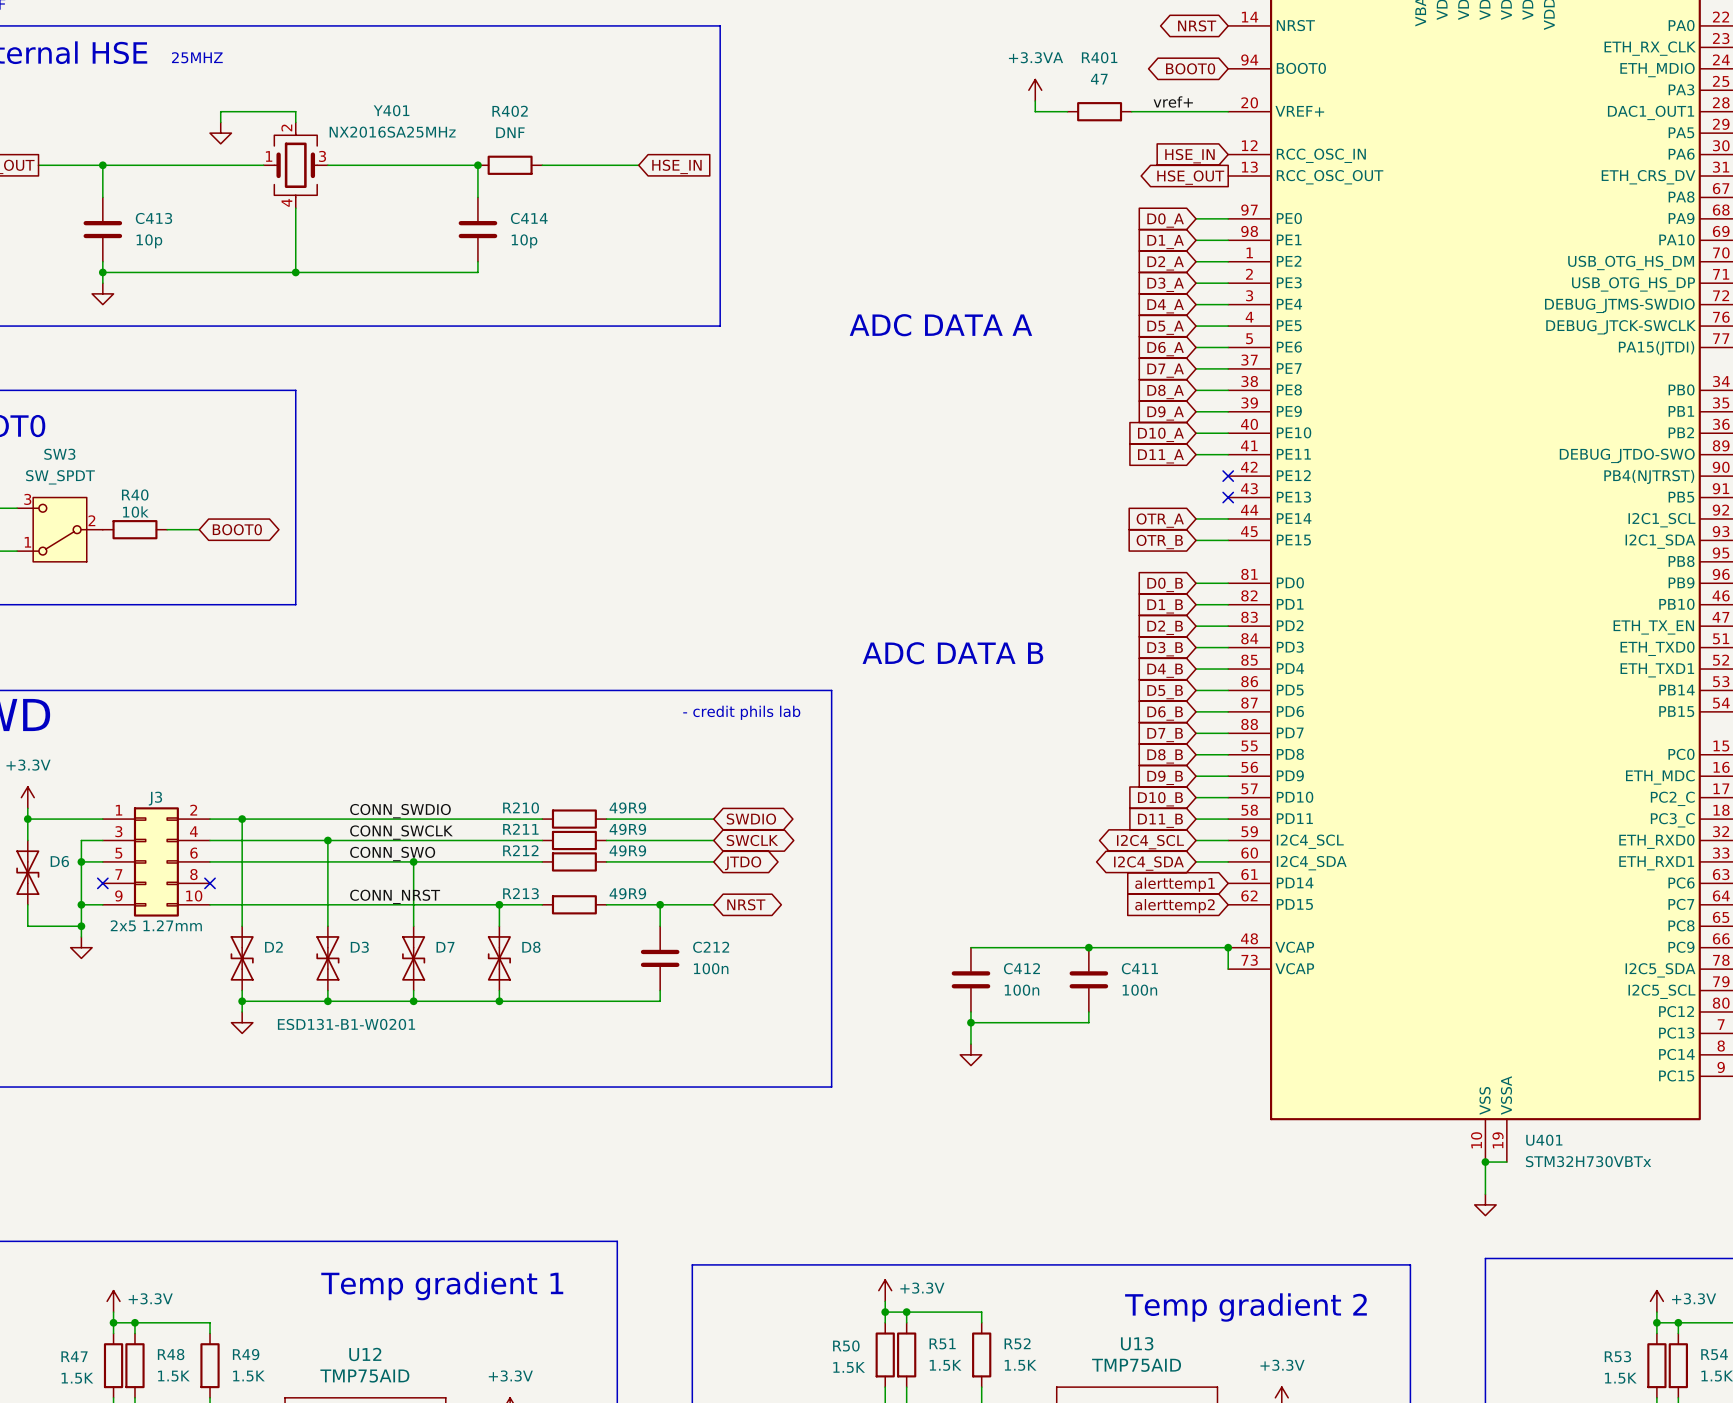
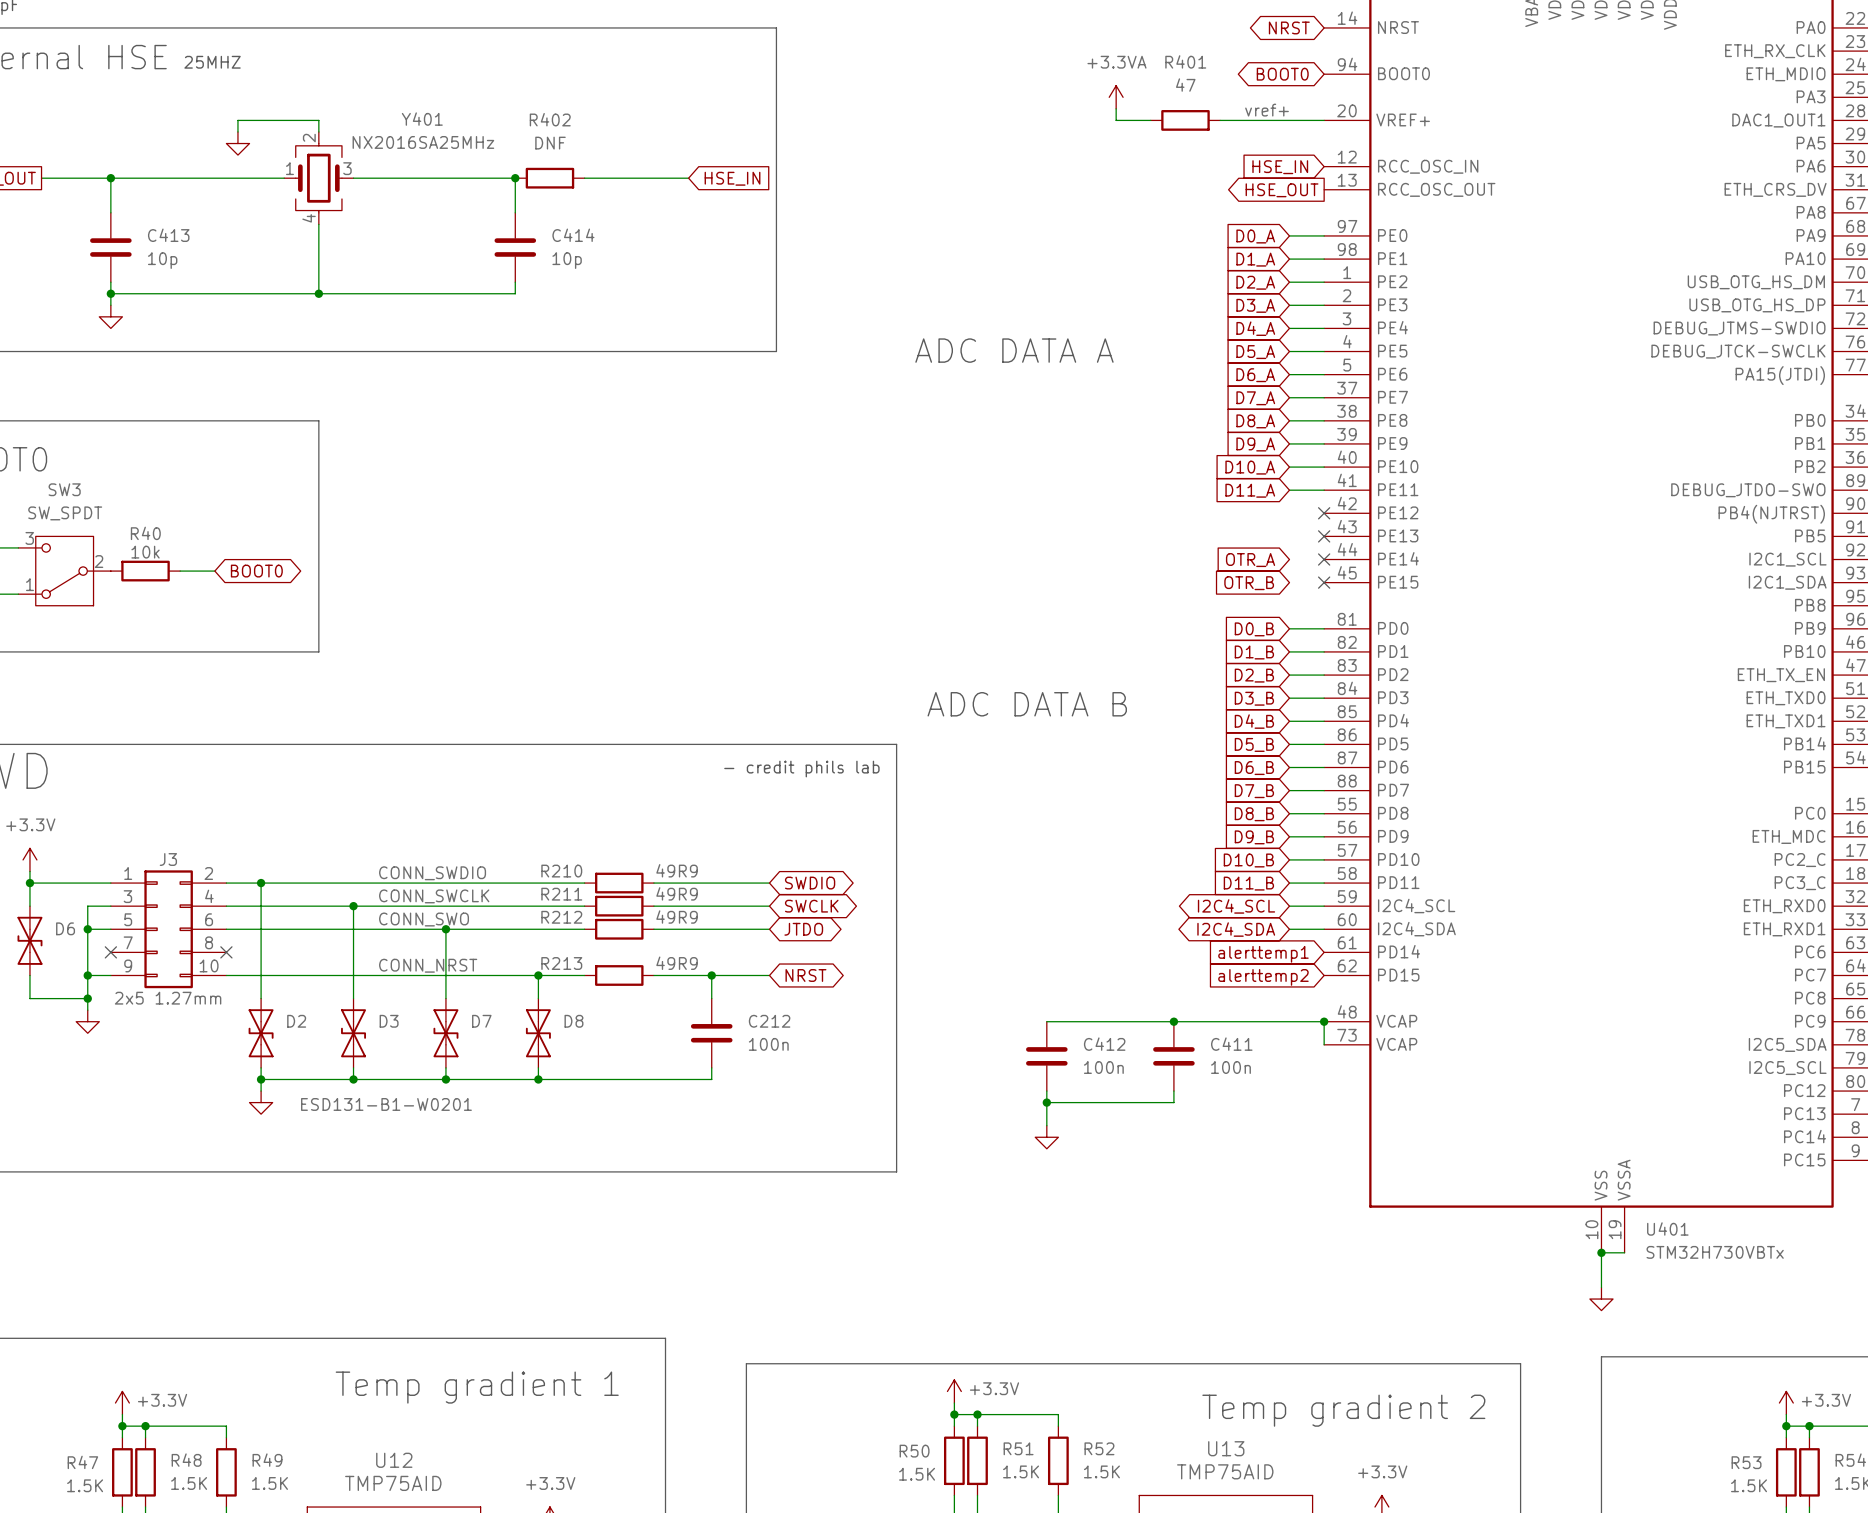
wire: (1196, 518) (1228, 518) -> none
no-connect mark: none -> (1324, 559)
wire: (1196, 540) (1228, 540) -> none
no-connect mark: none -> (1324, 582)

